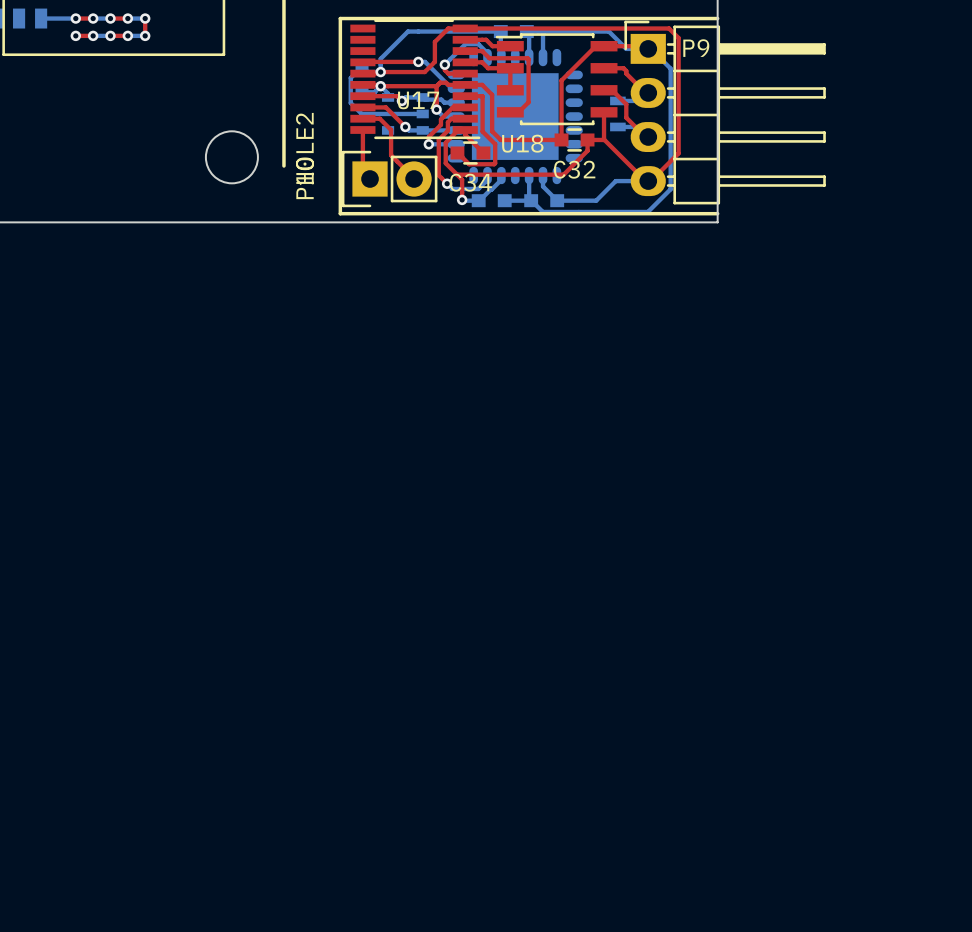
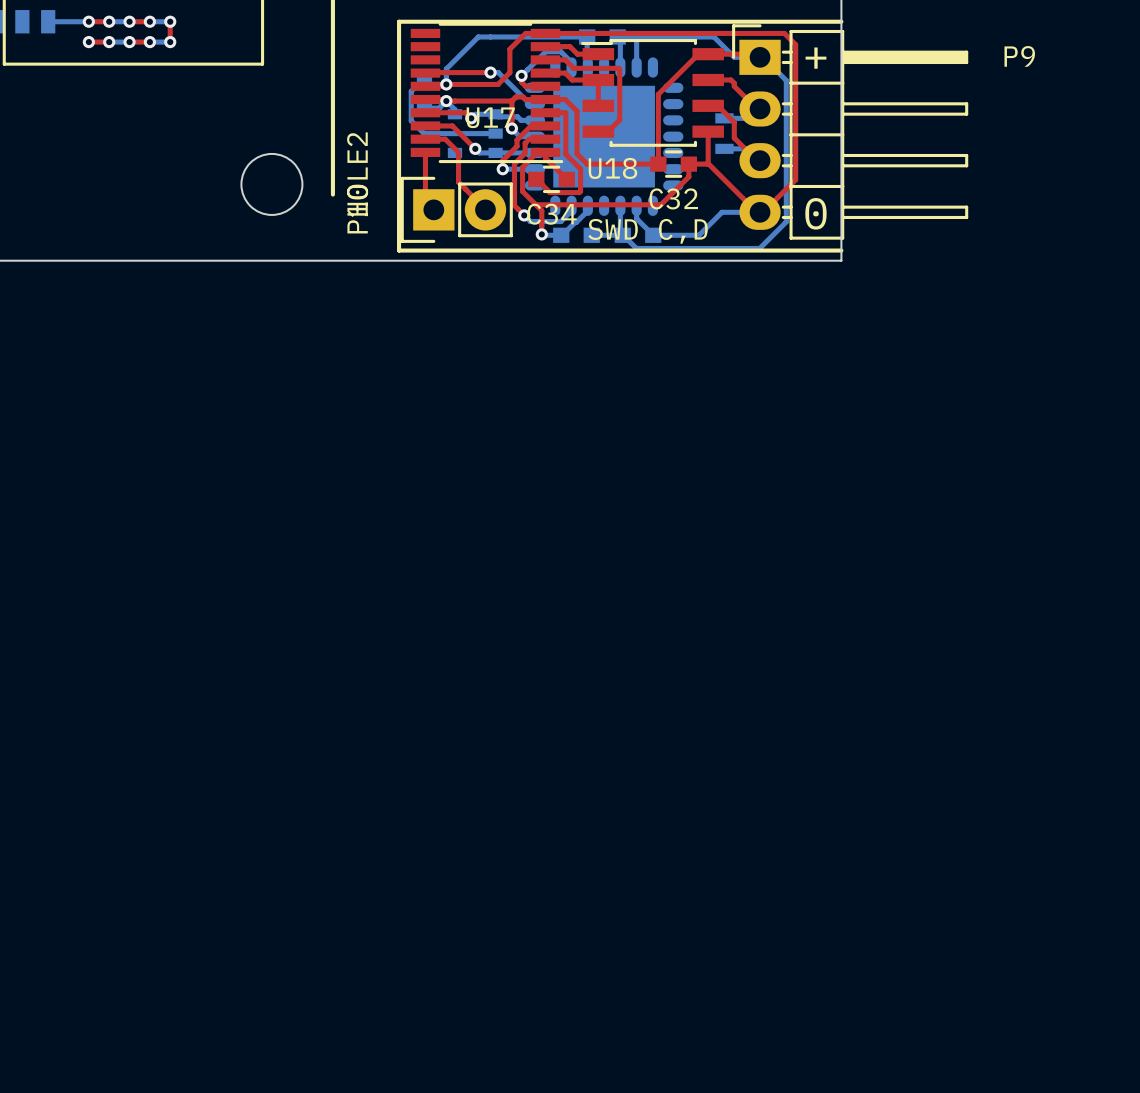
P9 name position: P9 (696, 48) -> P9 (1019, 56)
text: none -> + (815, 58)
text: none -> 0 (815, 213)
text: none -> SWD C,D (648, 231)

